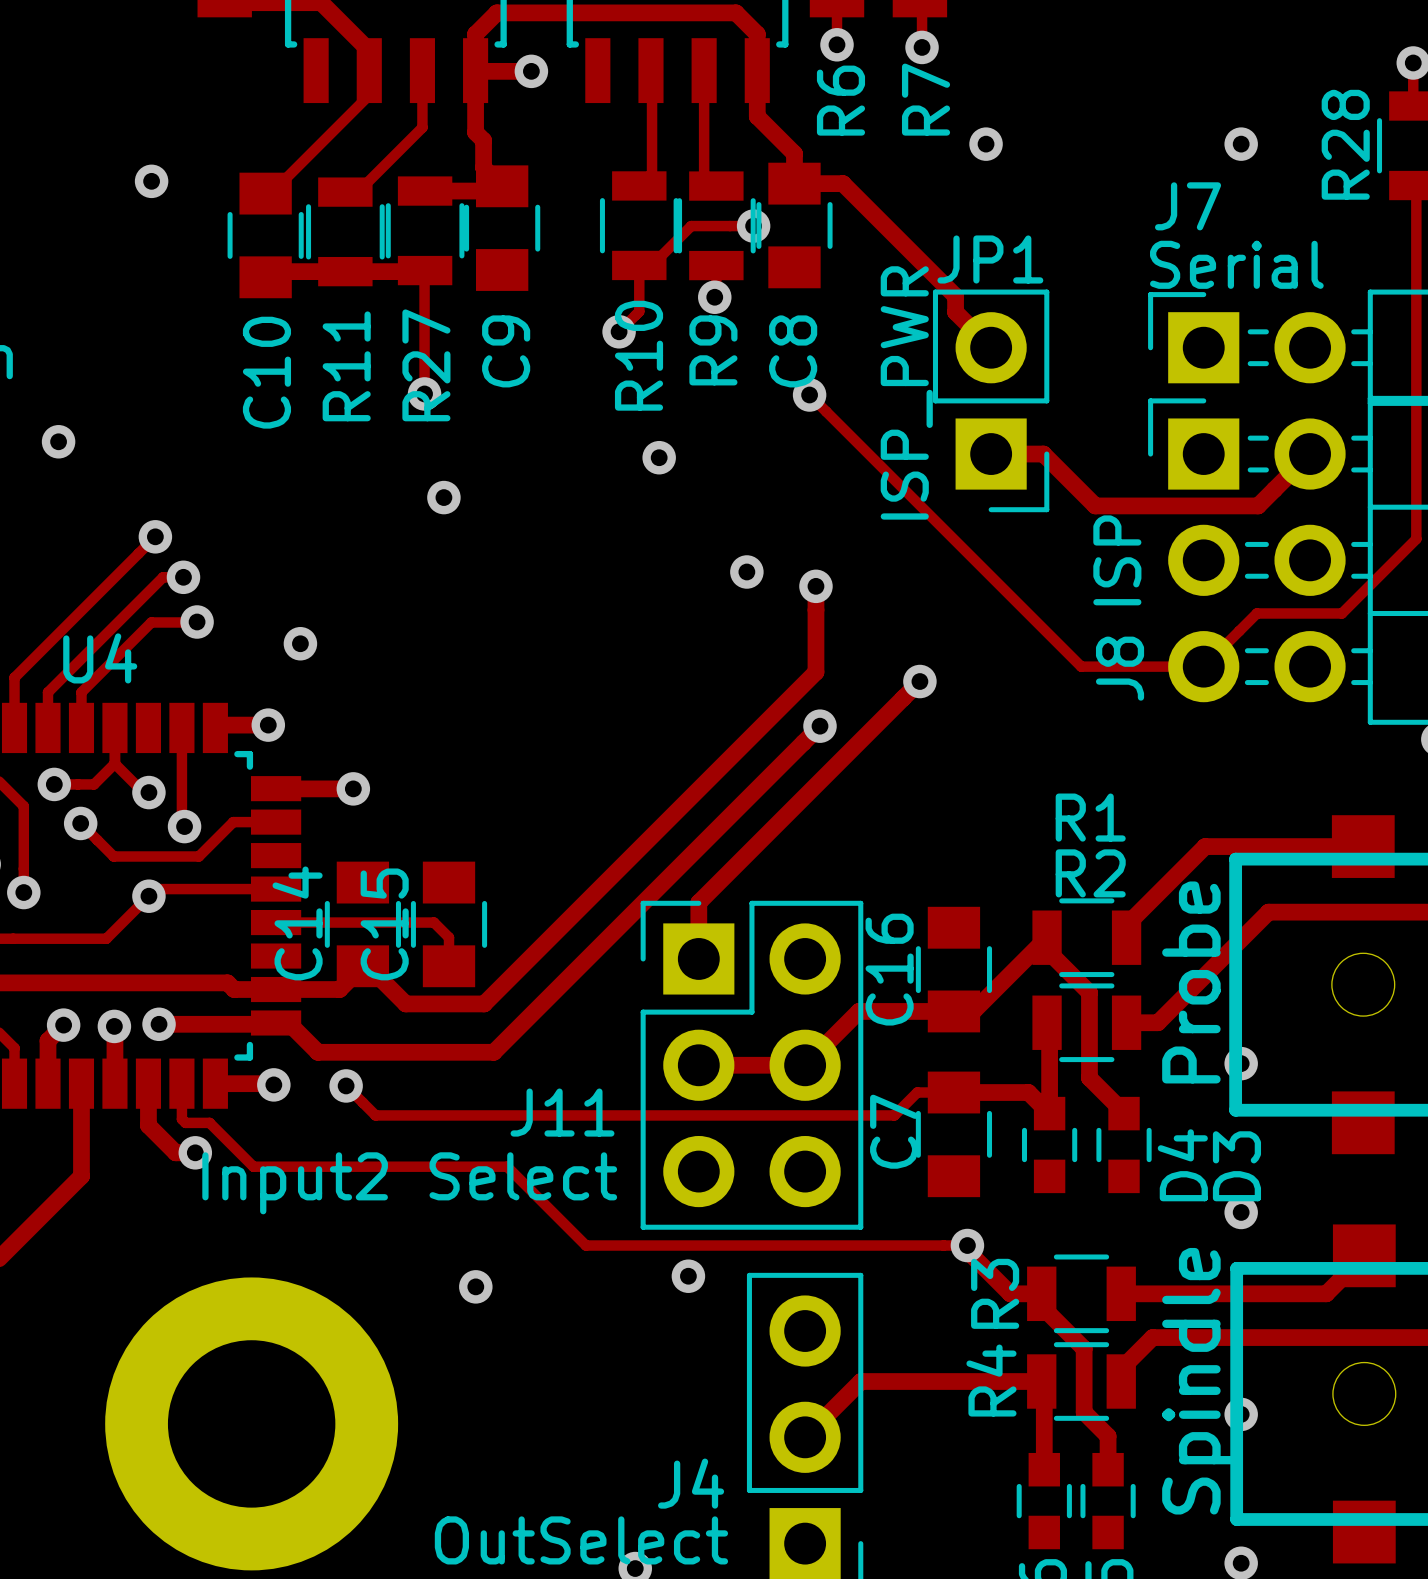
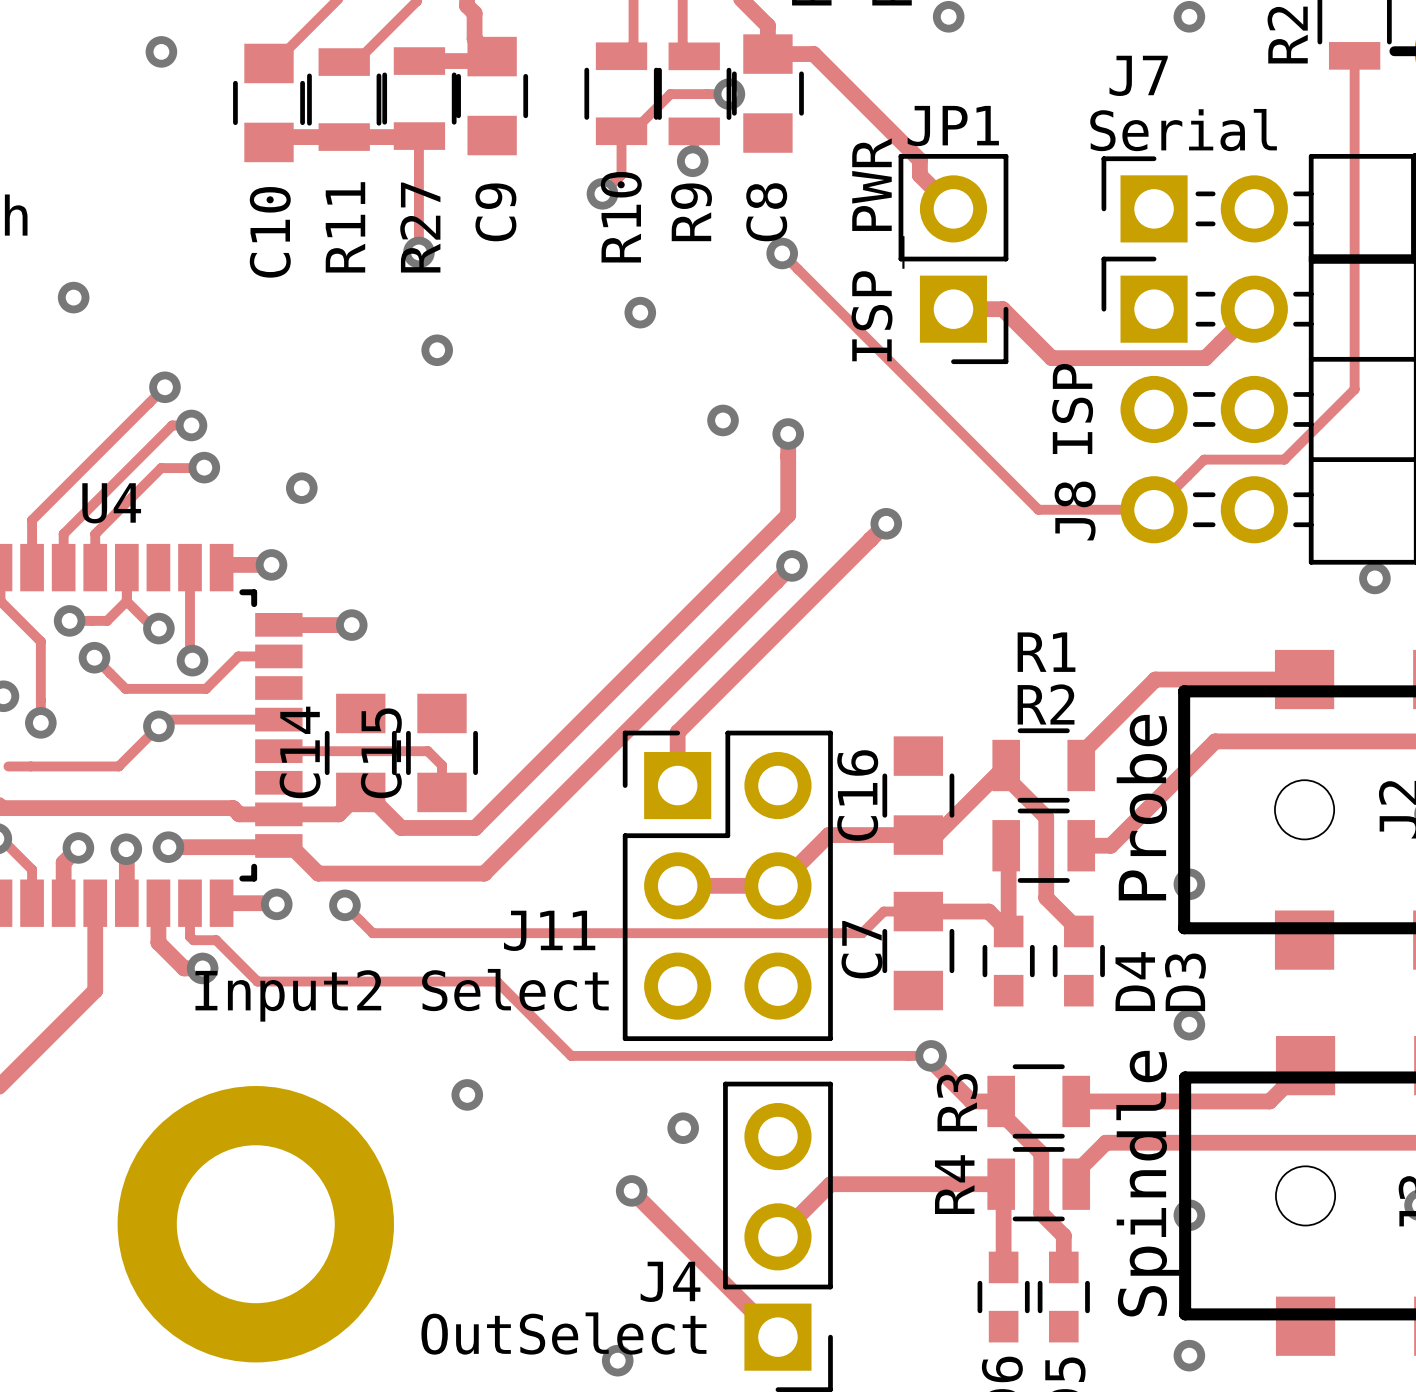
via position: (688, 1276) -> (683, 1128)
track: none -> (631, 1190) (777, 1337)
via: none -> (631, 1190)

